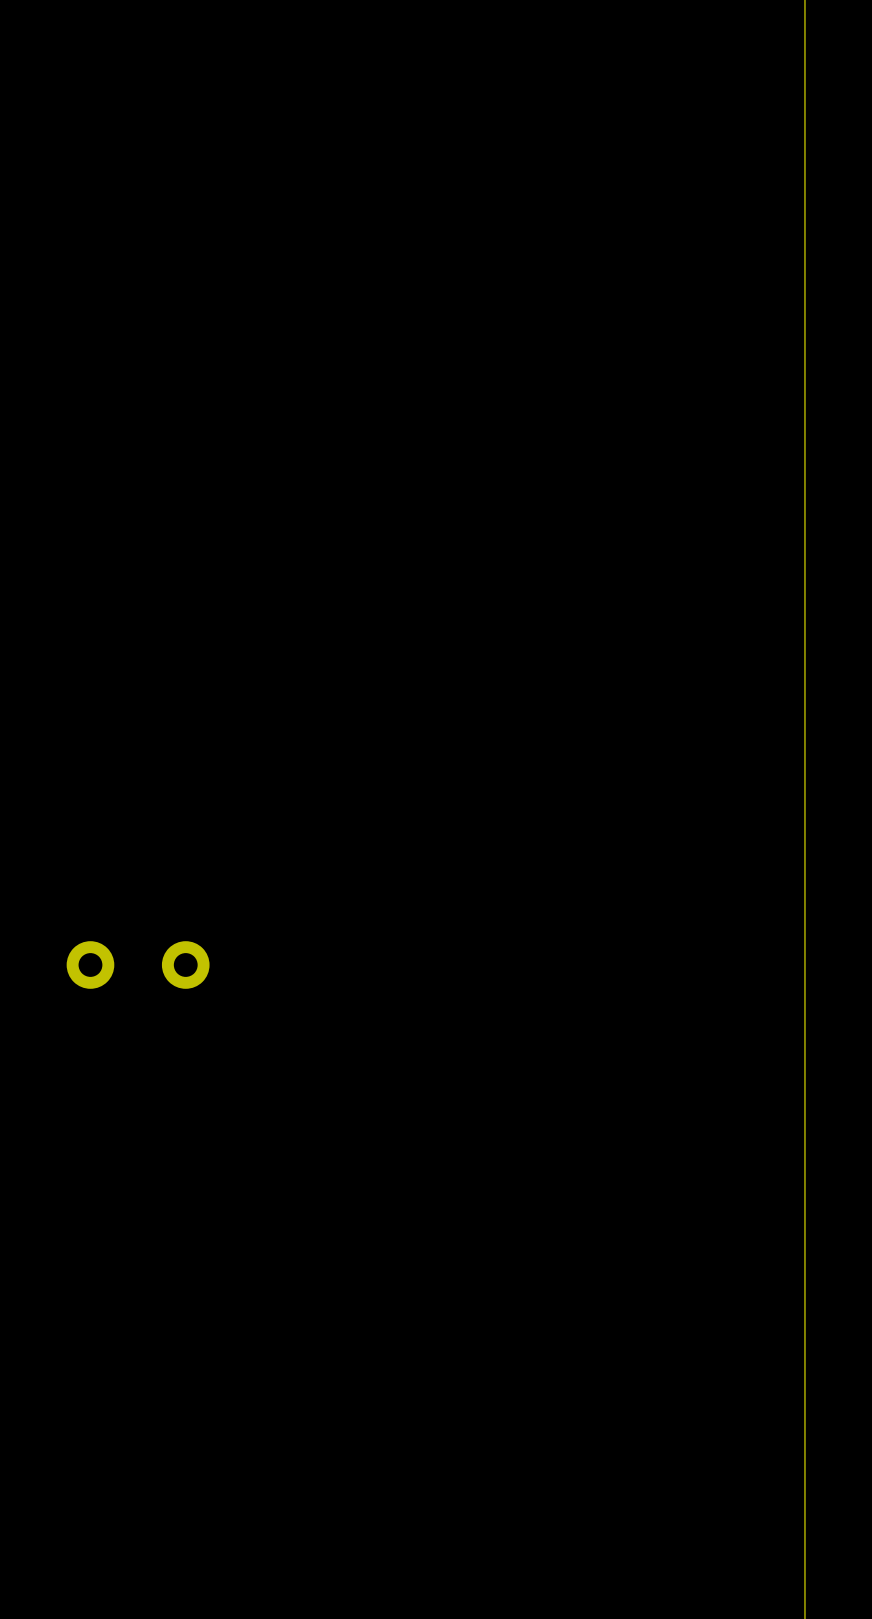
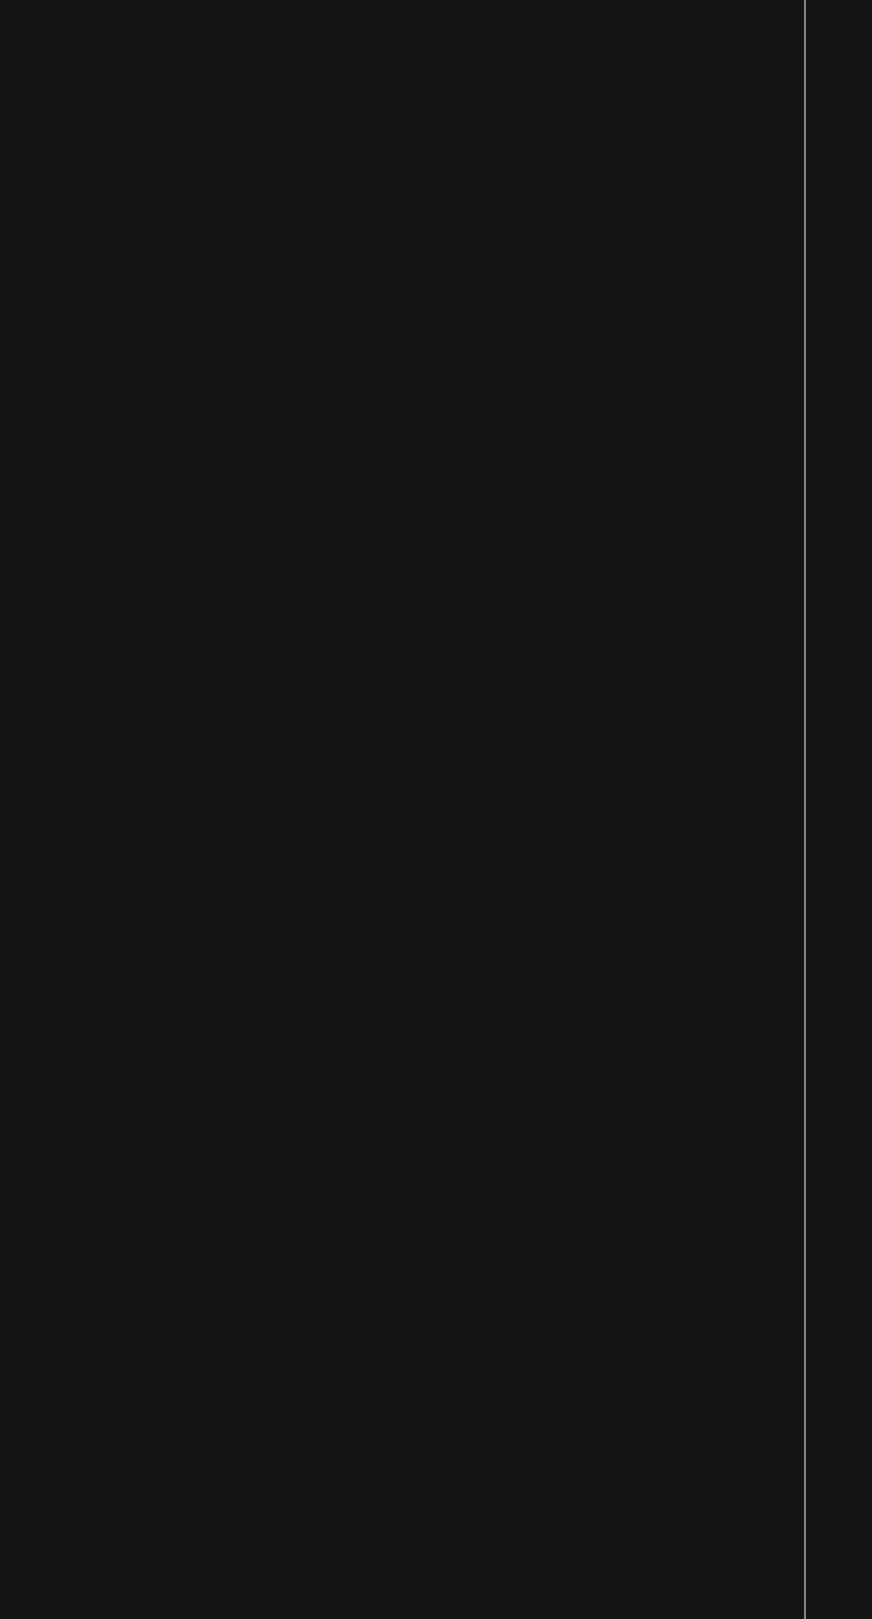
part: (90, 964) -> none
part: (185, 964) -> none

